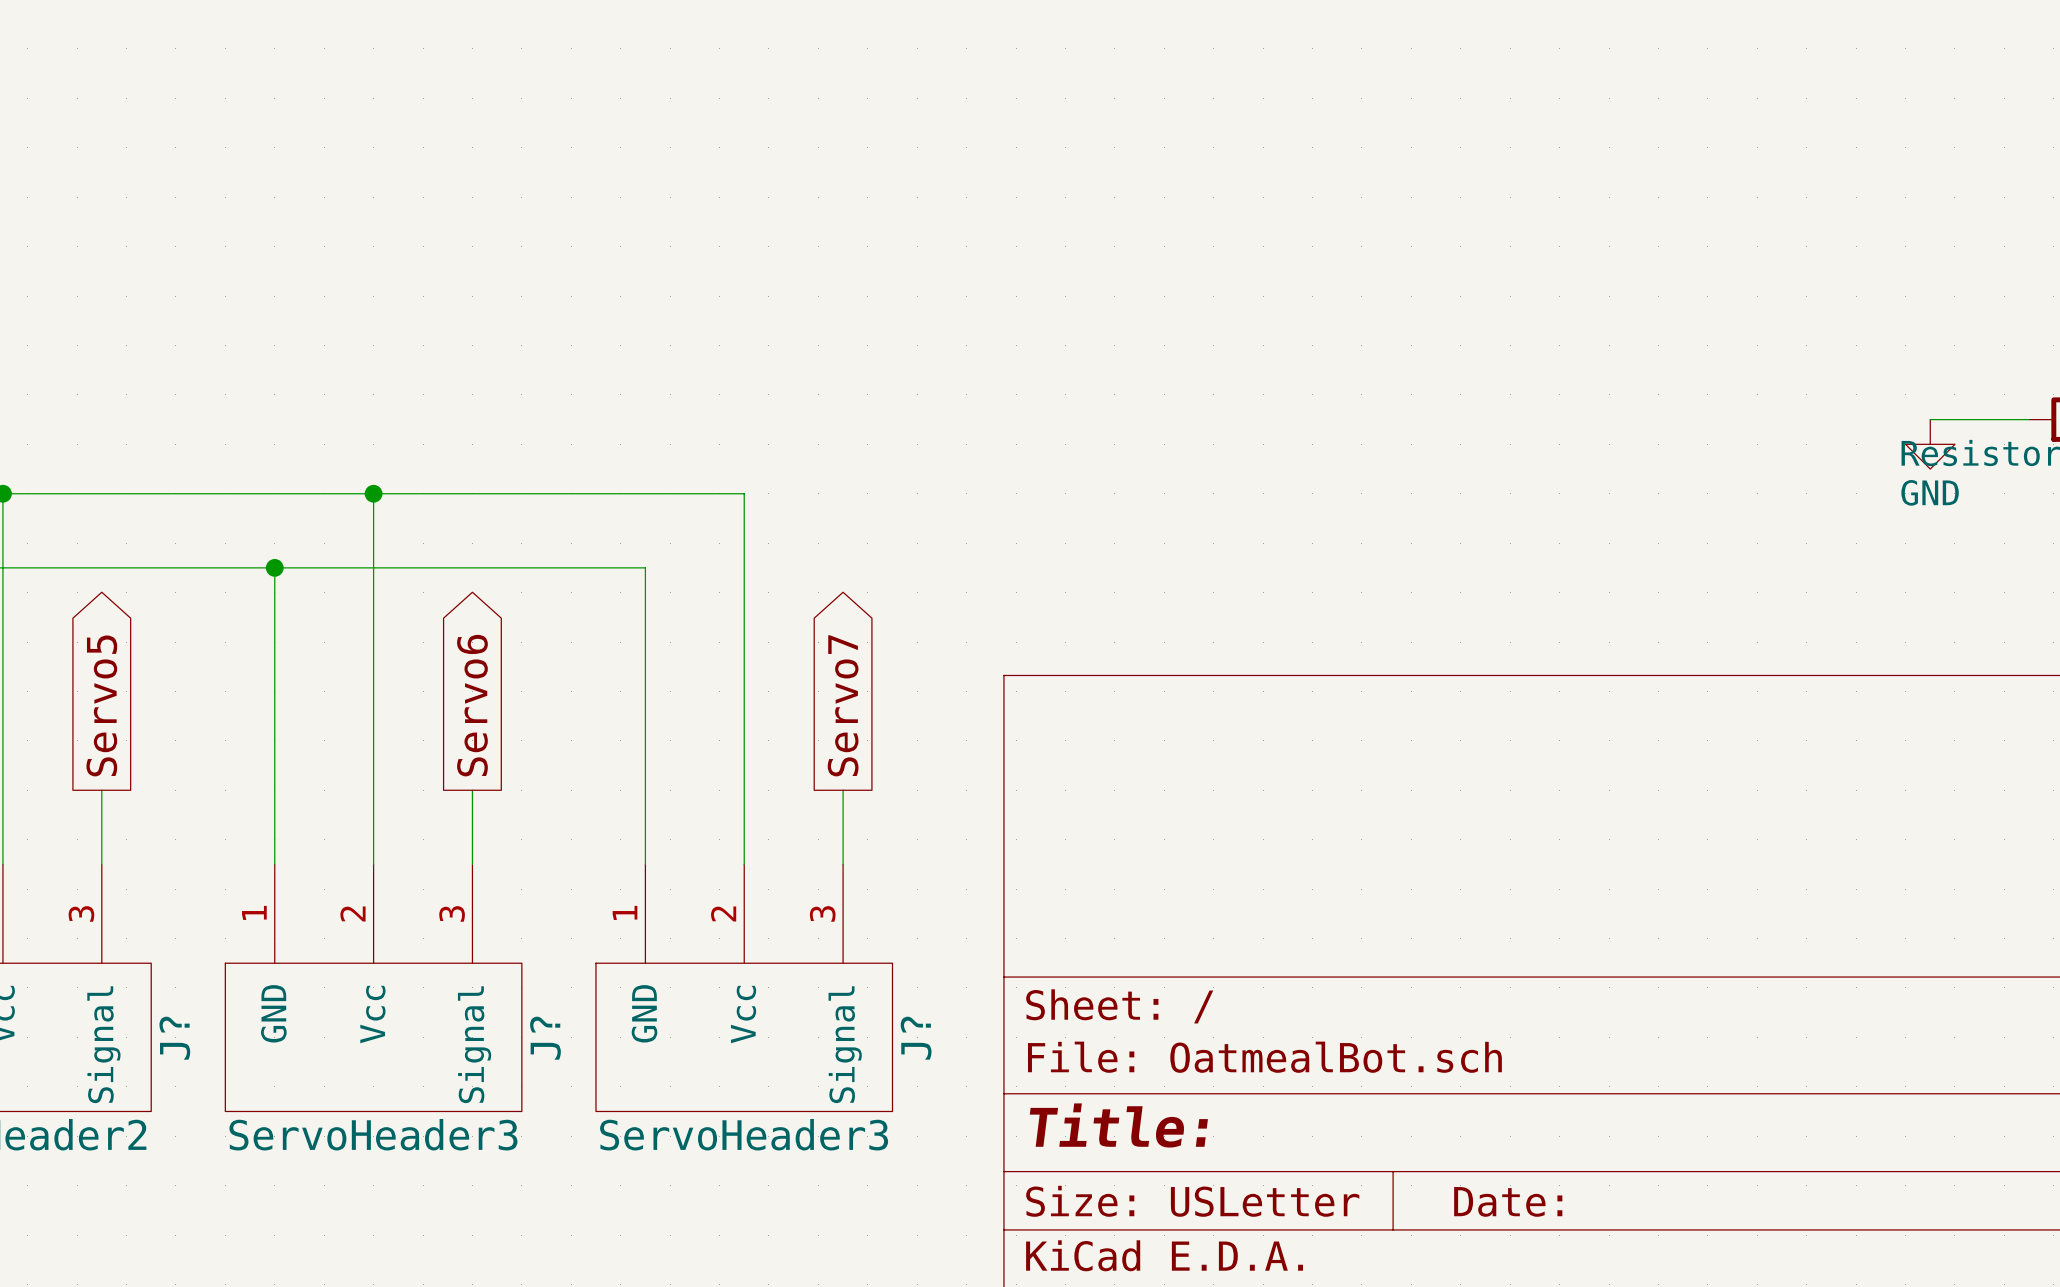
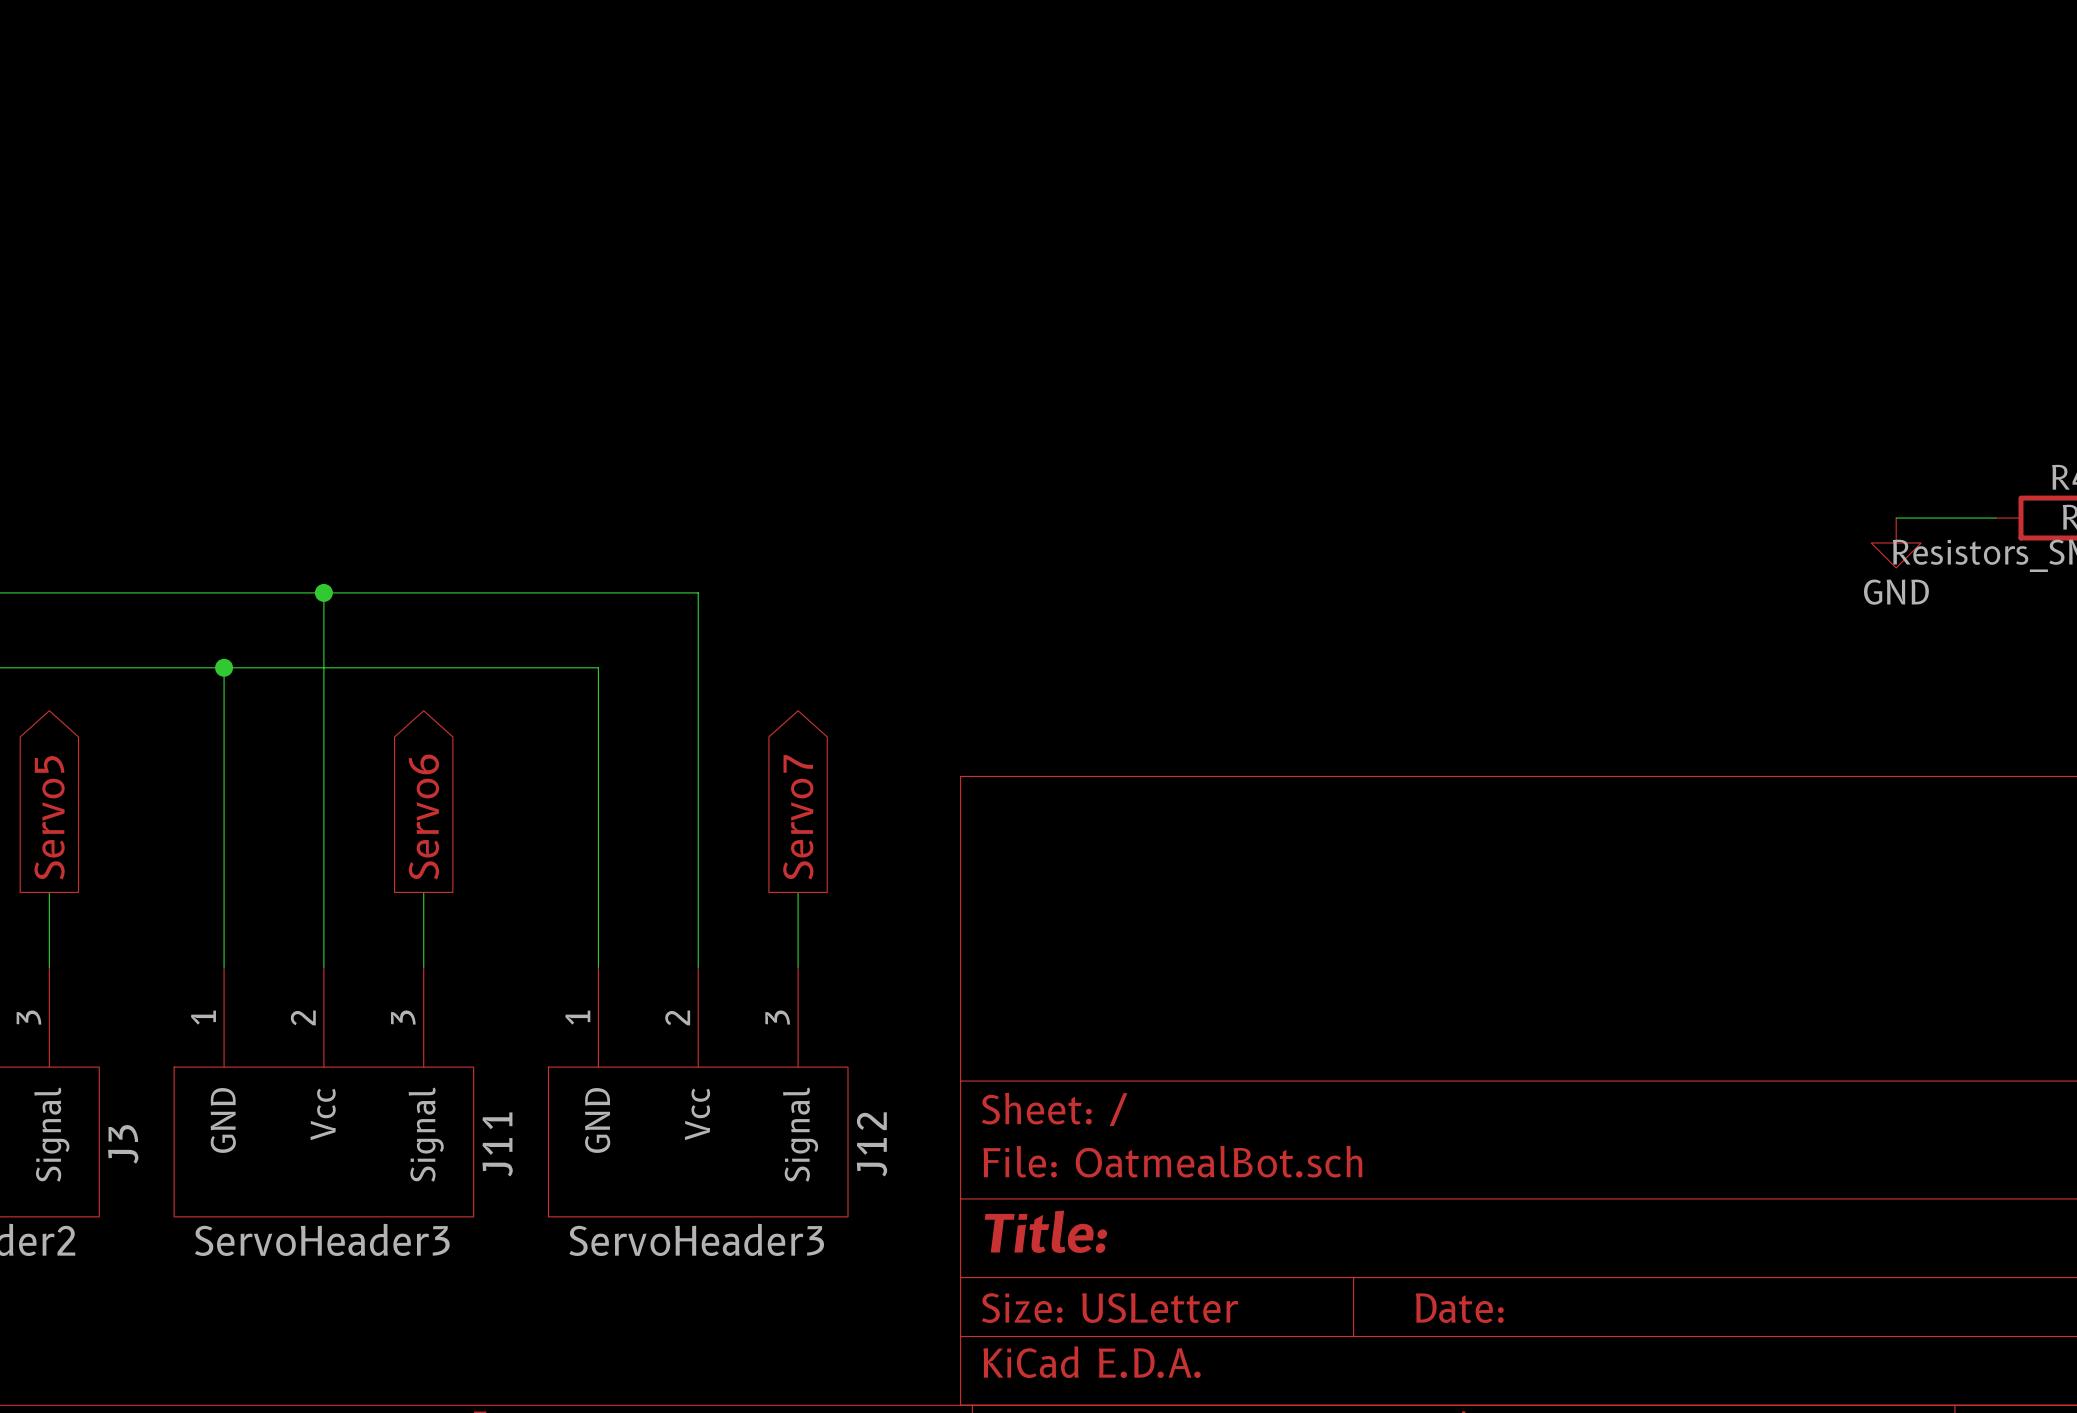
J? name: J? (174, 1038) -> J3 (123, 1144)
J? name: J? (545, 1038) -> J11 (497, 1144)
J? name: J? (916, 1038) -> J12 (872, 1144)

